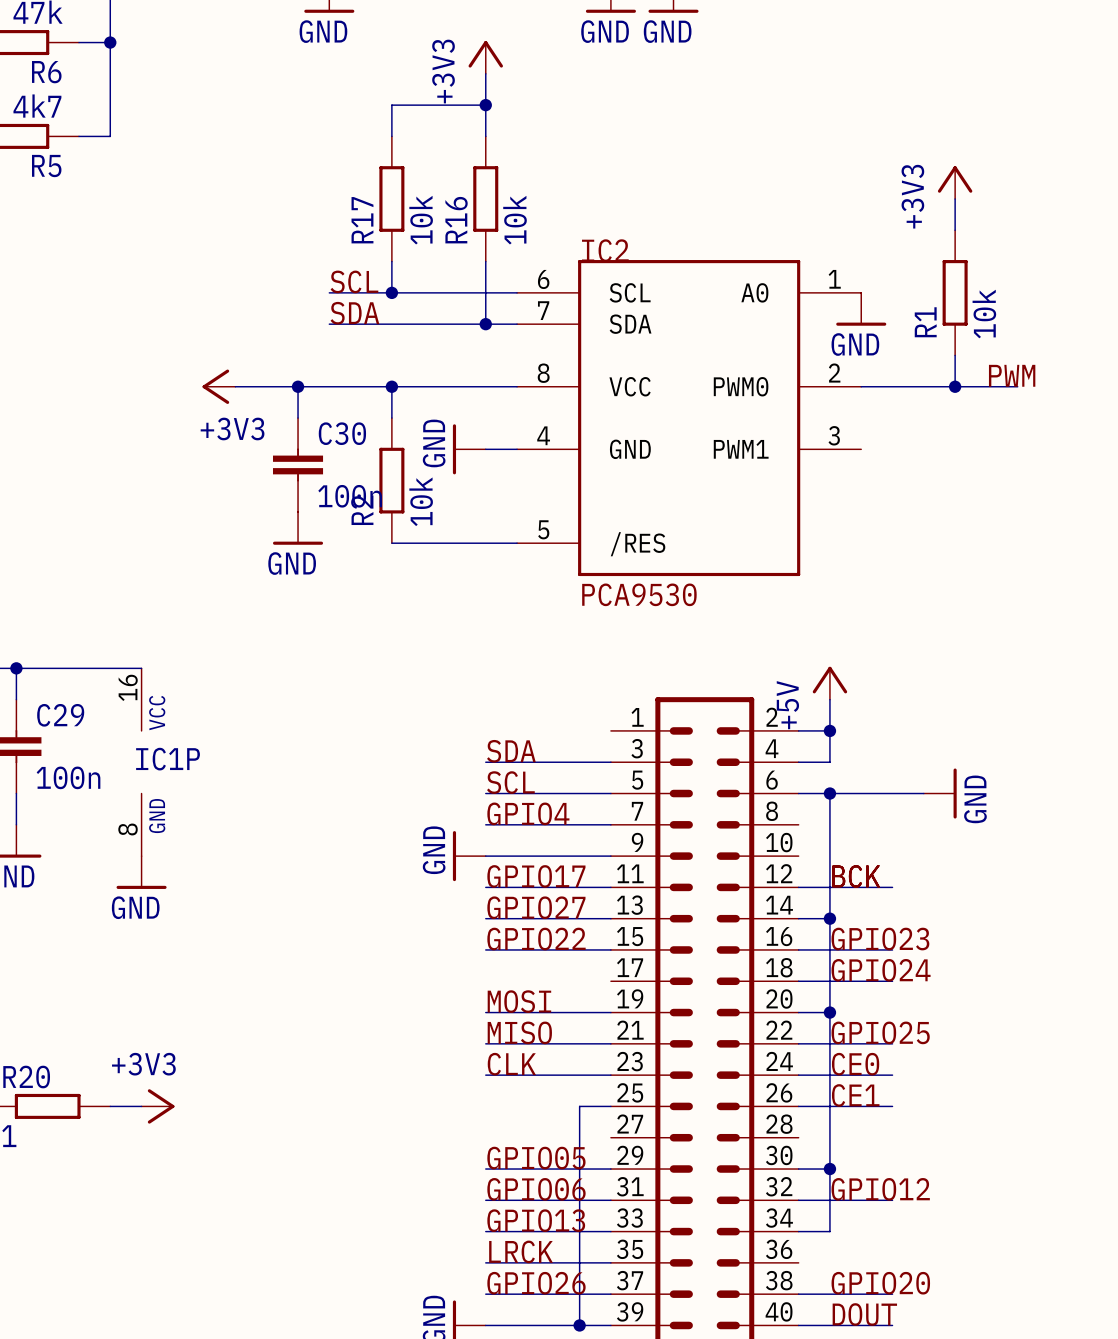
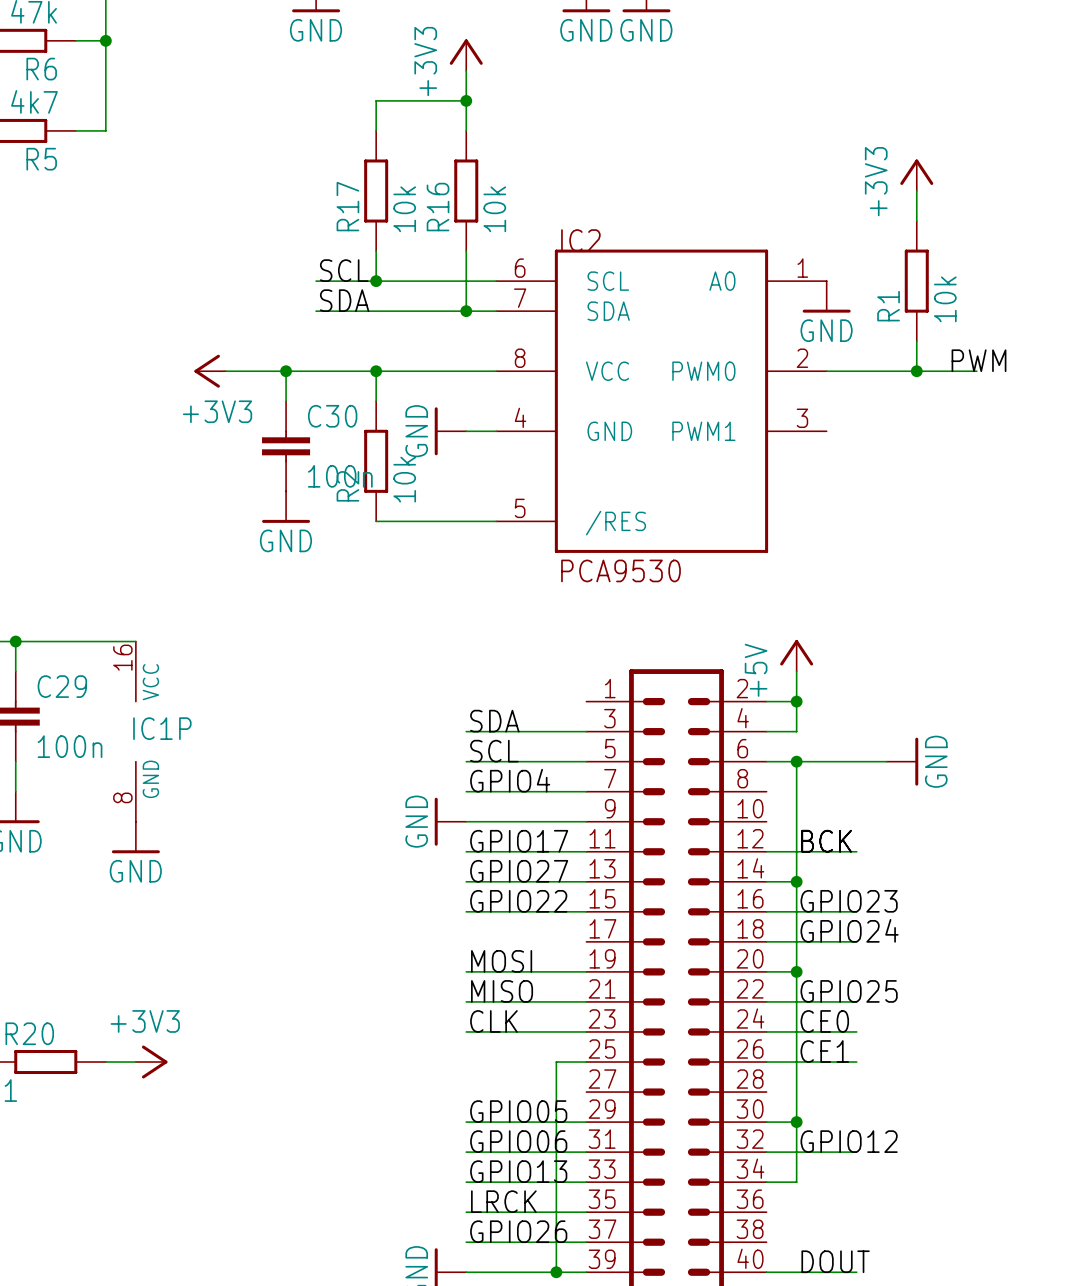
label: GPIO20 (880, 1283) -> none
wire: (798, 1294) (892, 1294) -> none

